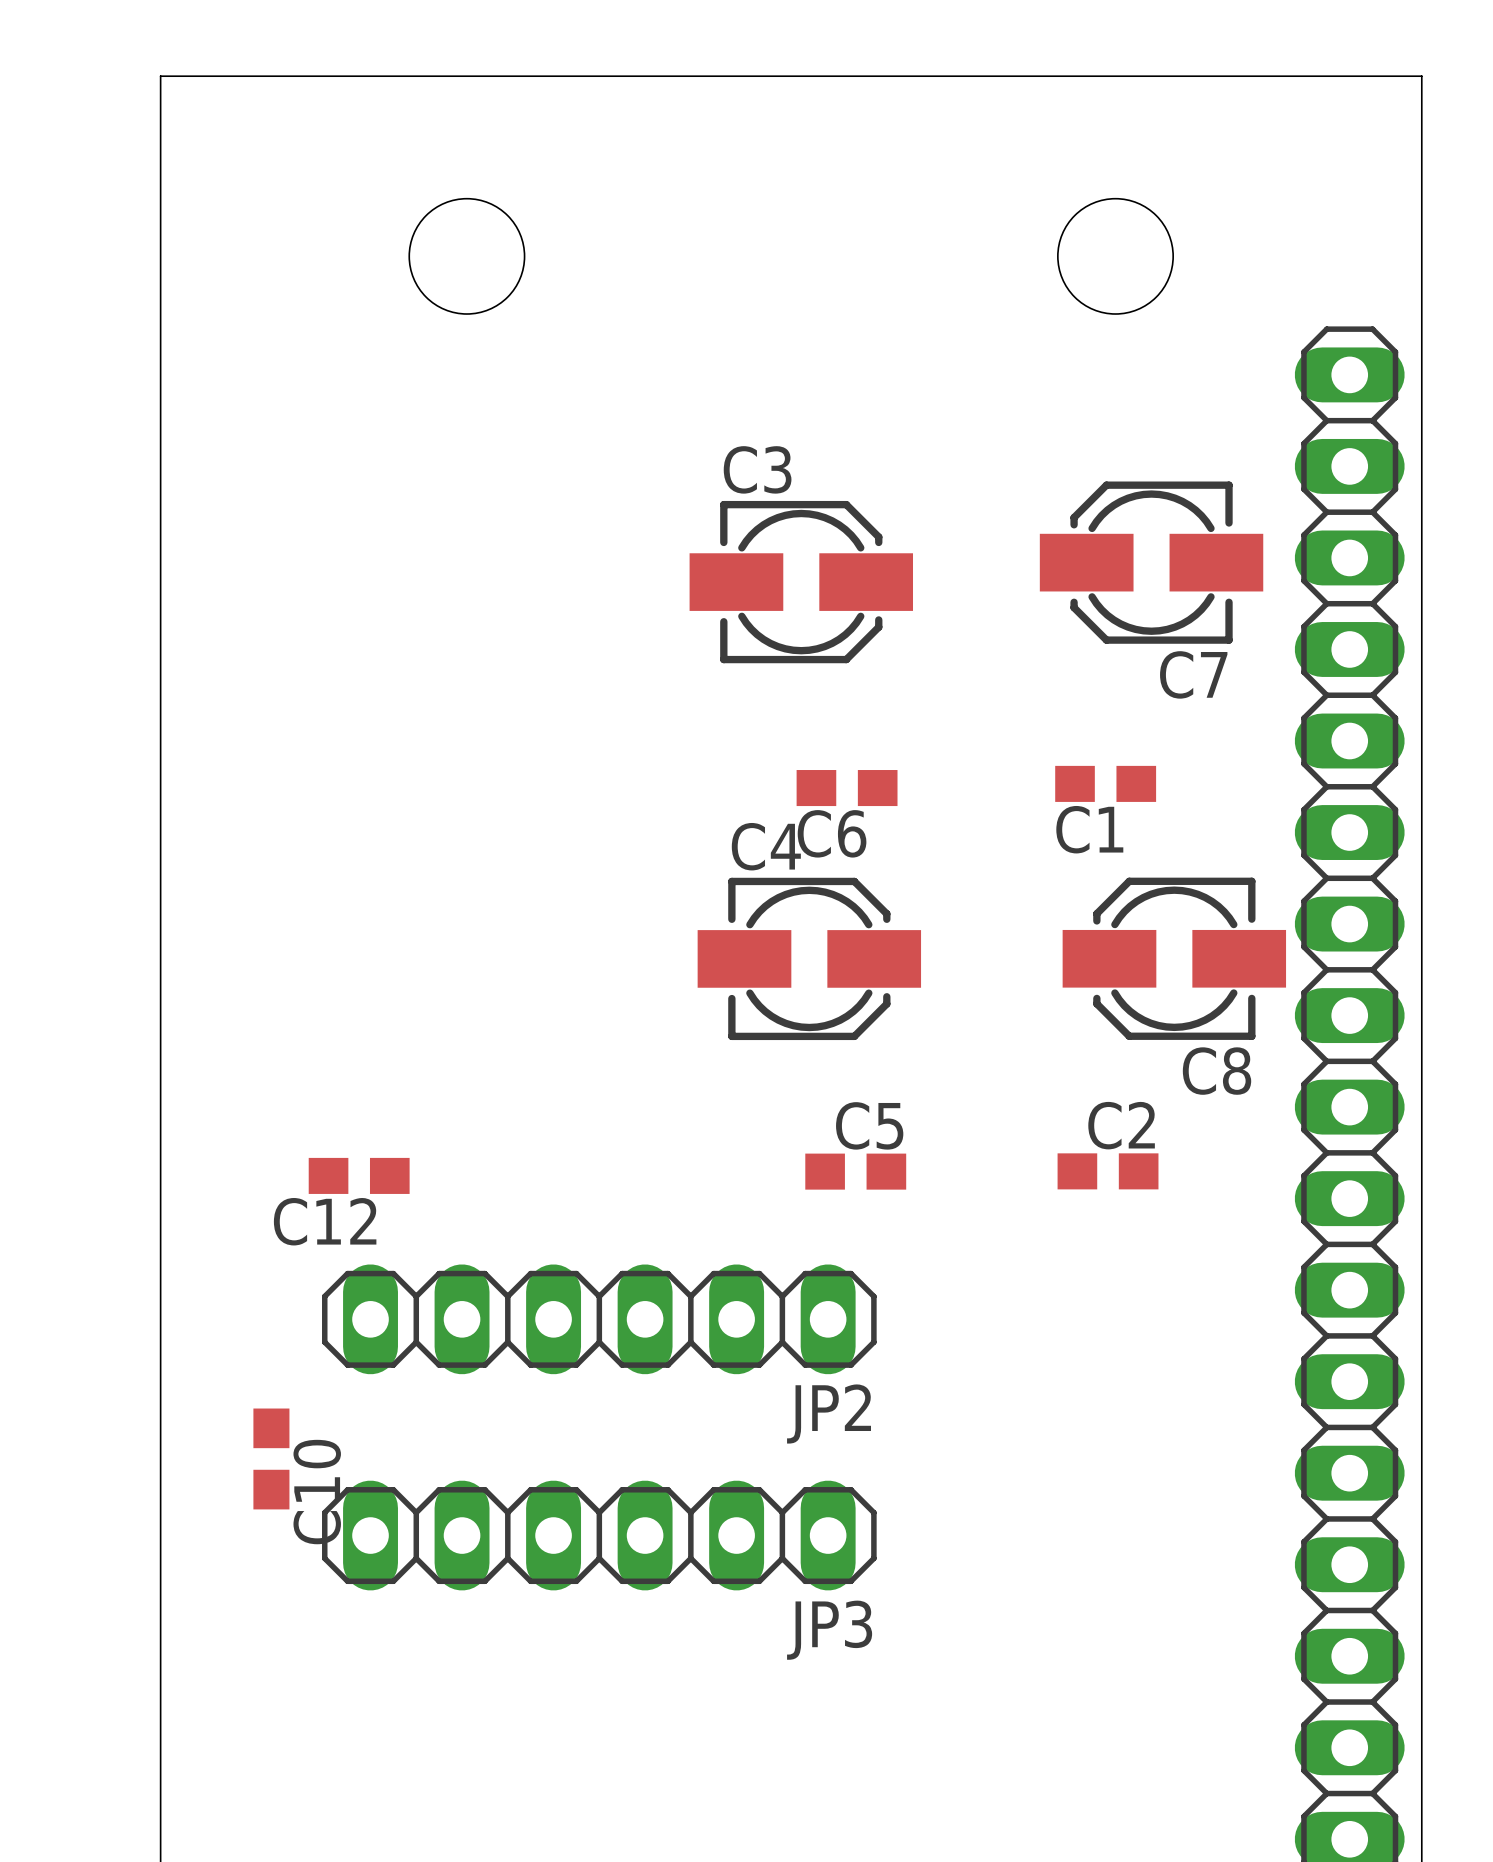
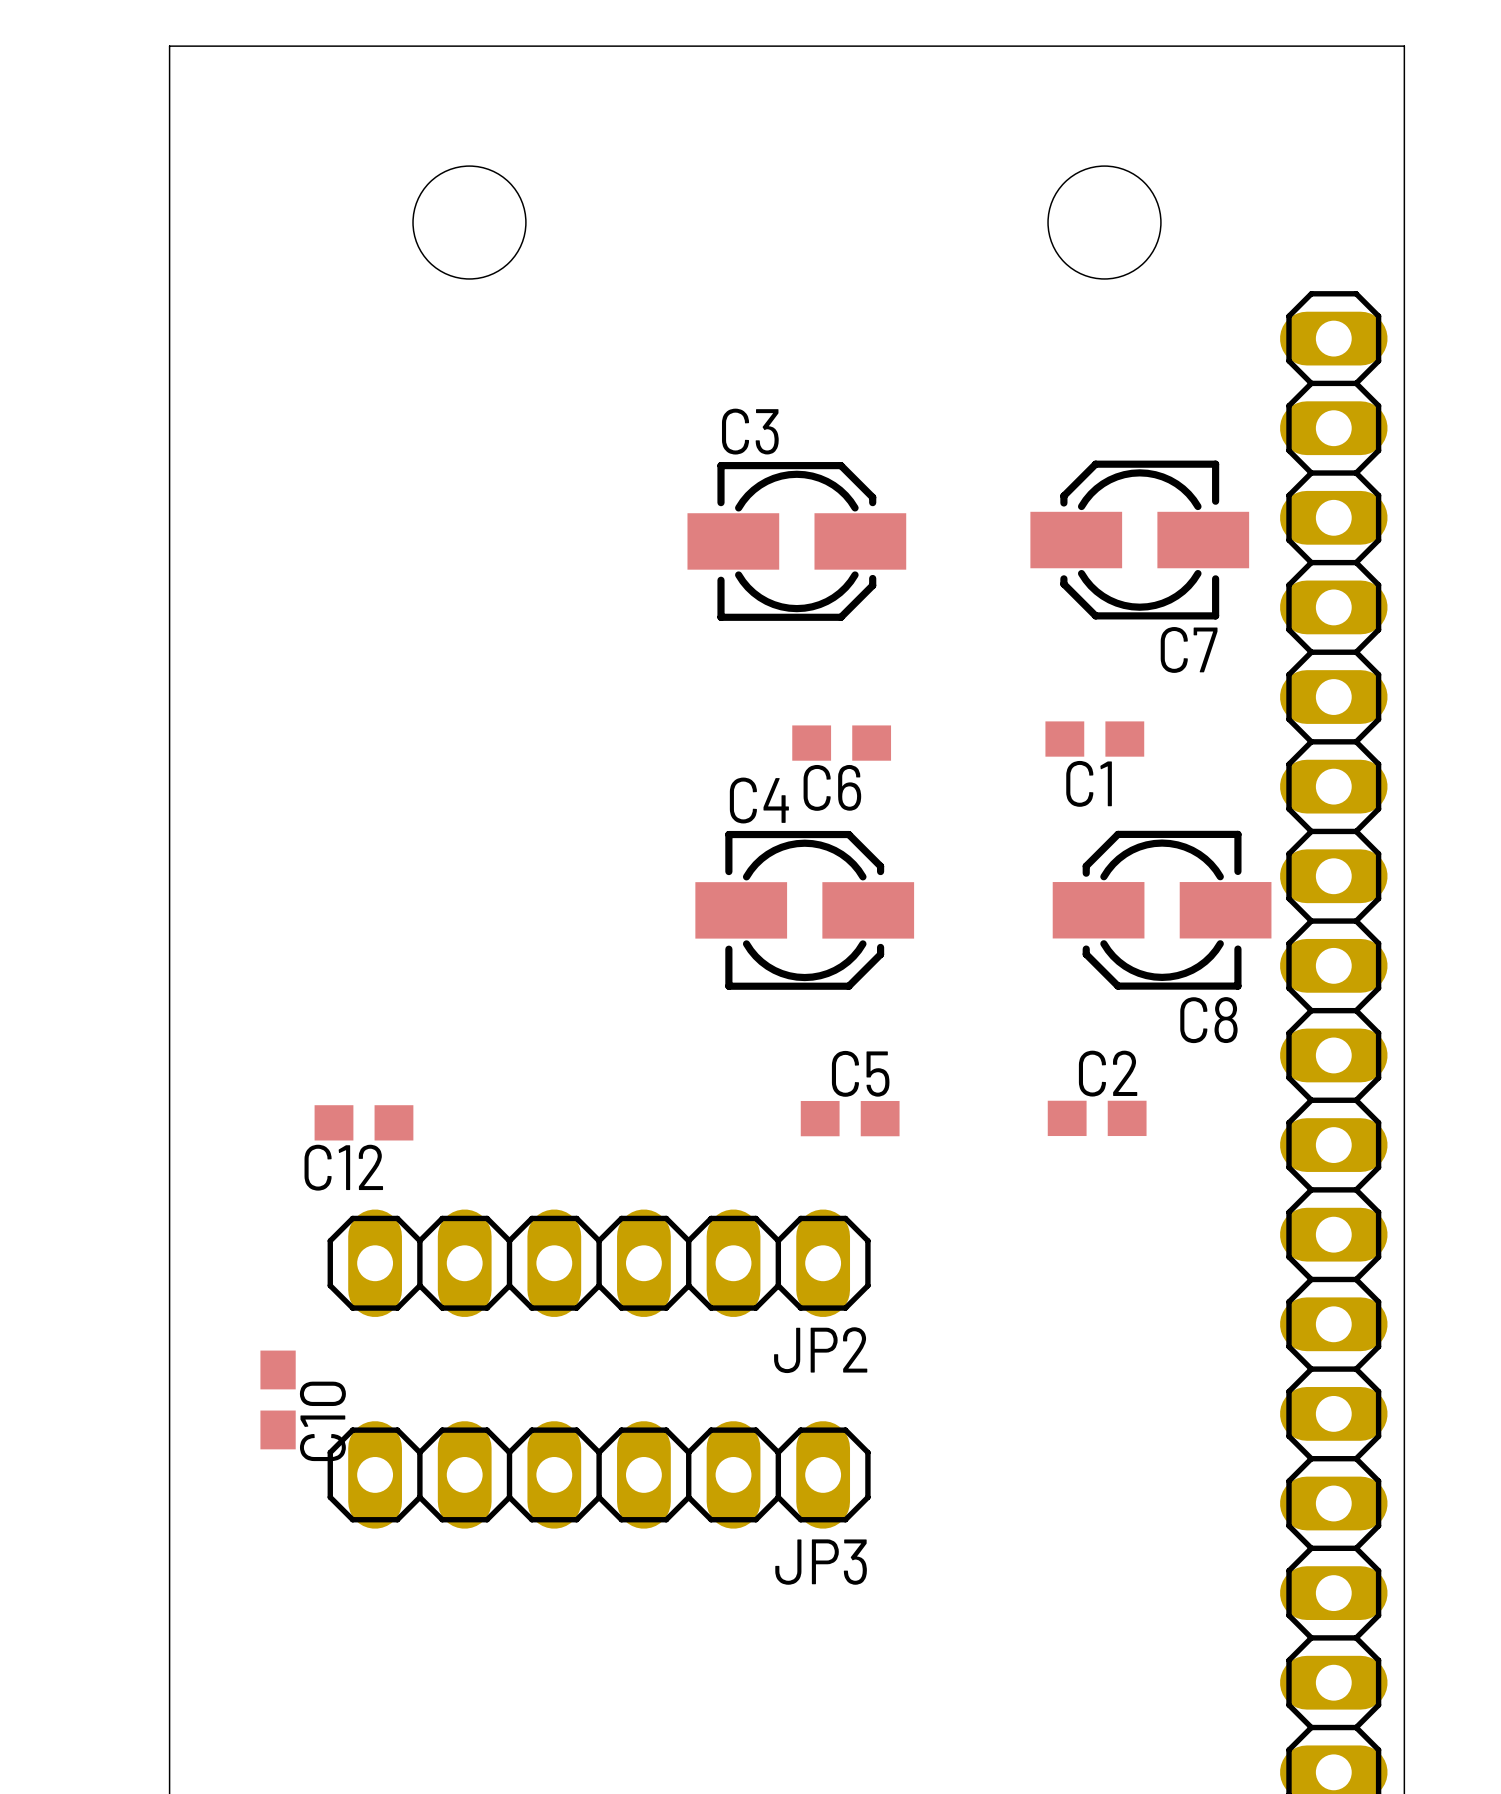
C7 position: (1151, 562) -> (1139, 540)

